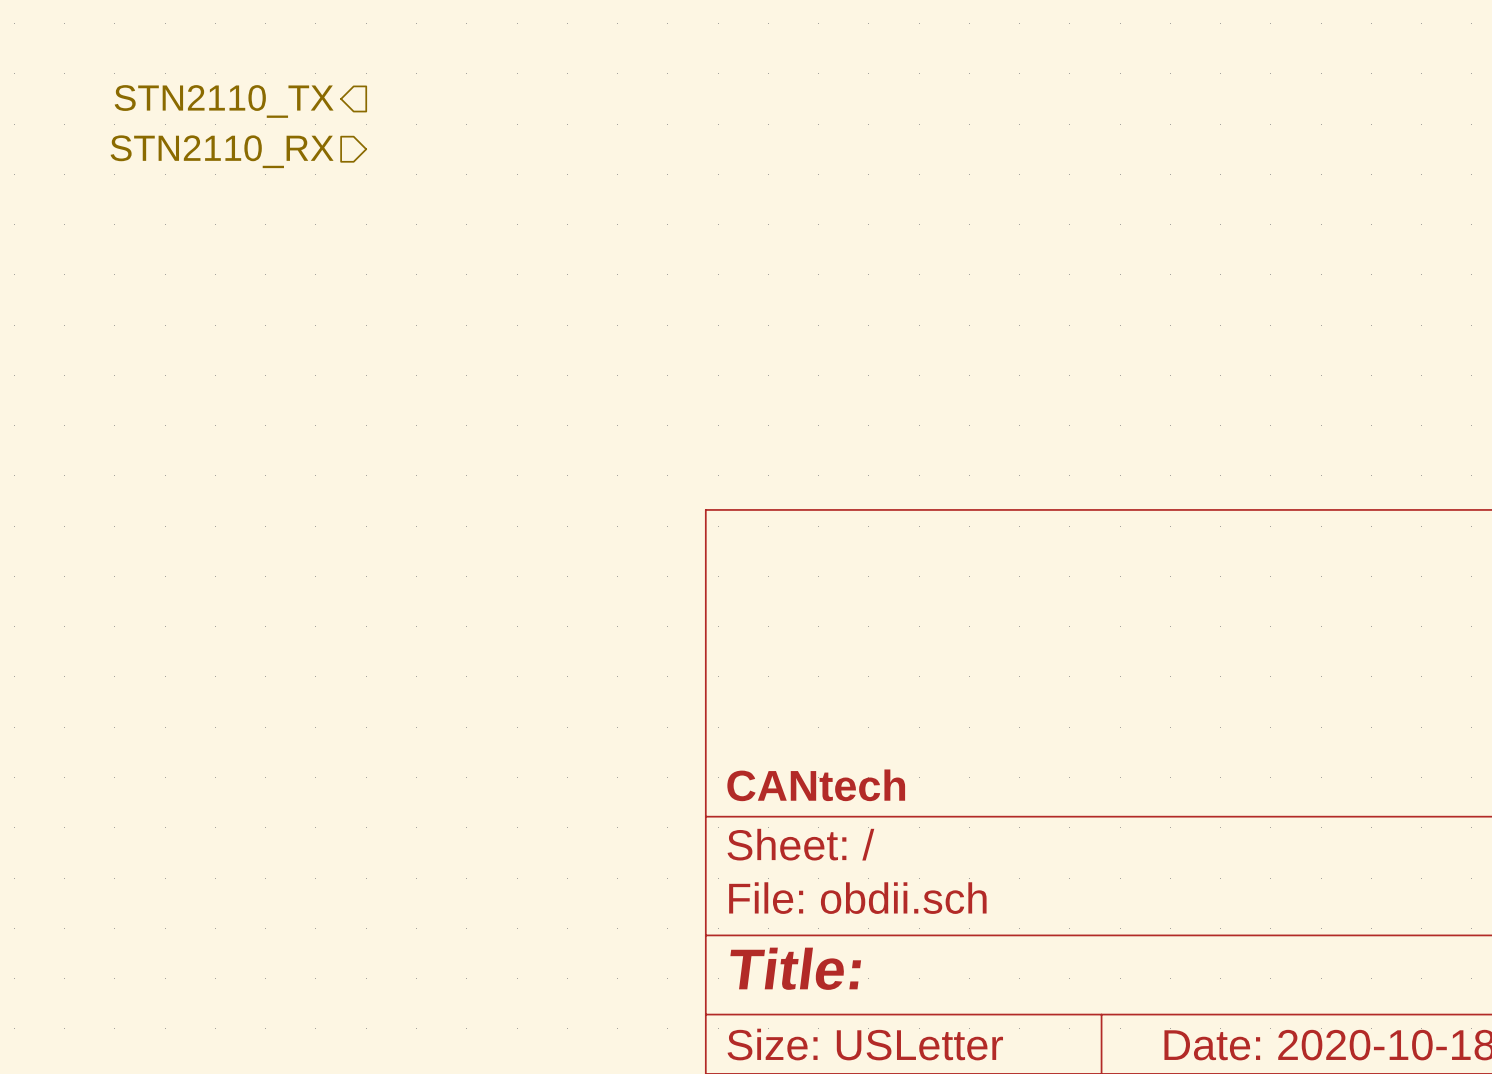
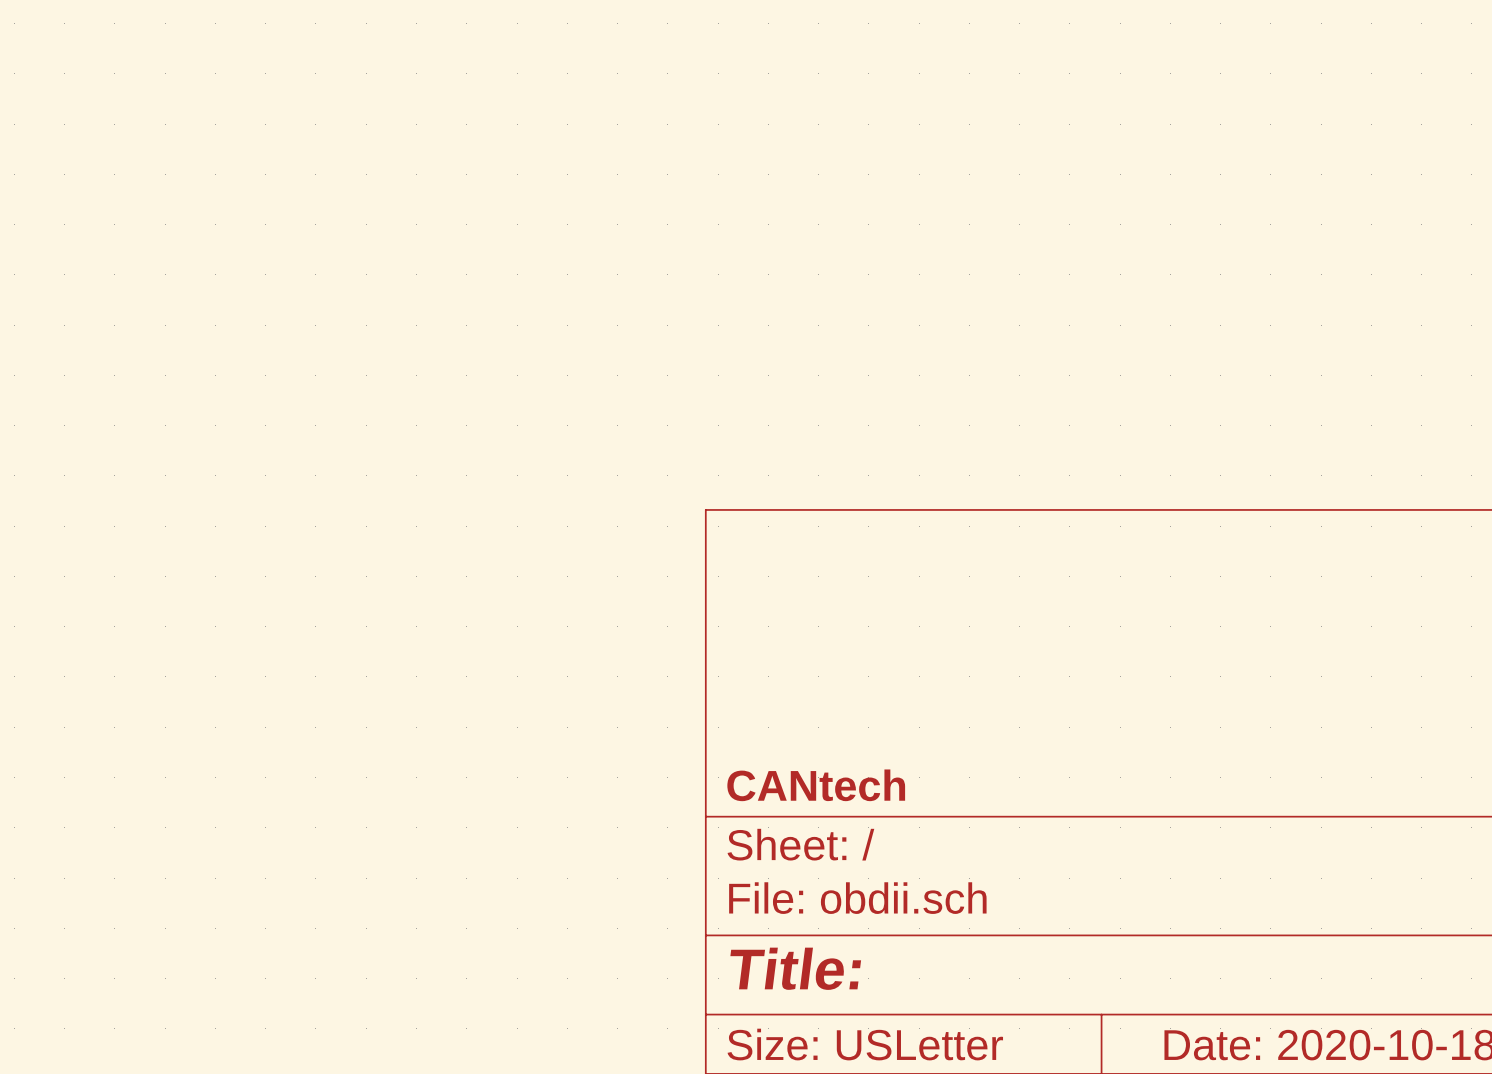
hierarchical label: STN2110_TX (224, 101) -> none
hierarchical label: STN2110_RX (222, 151) -> none

